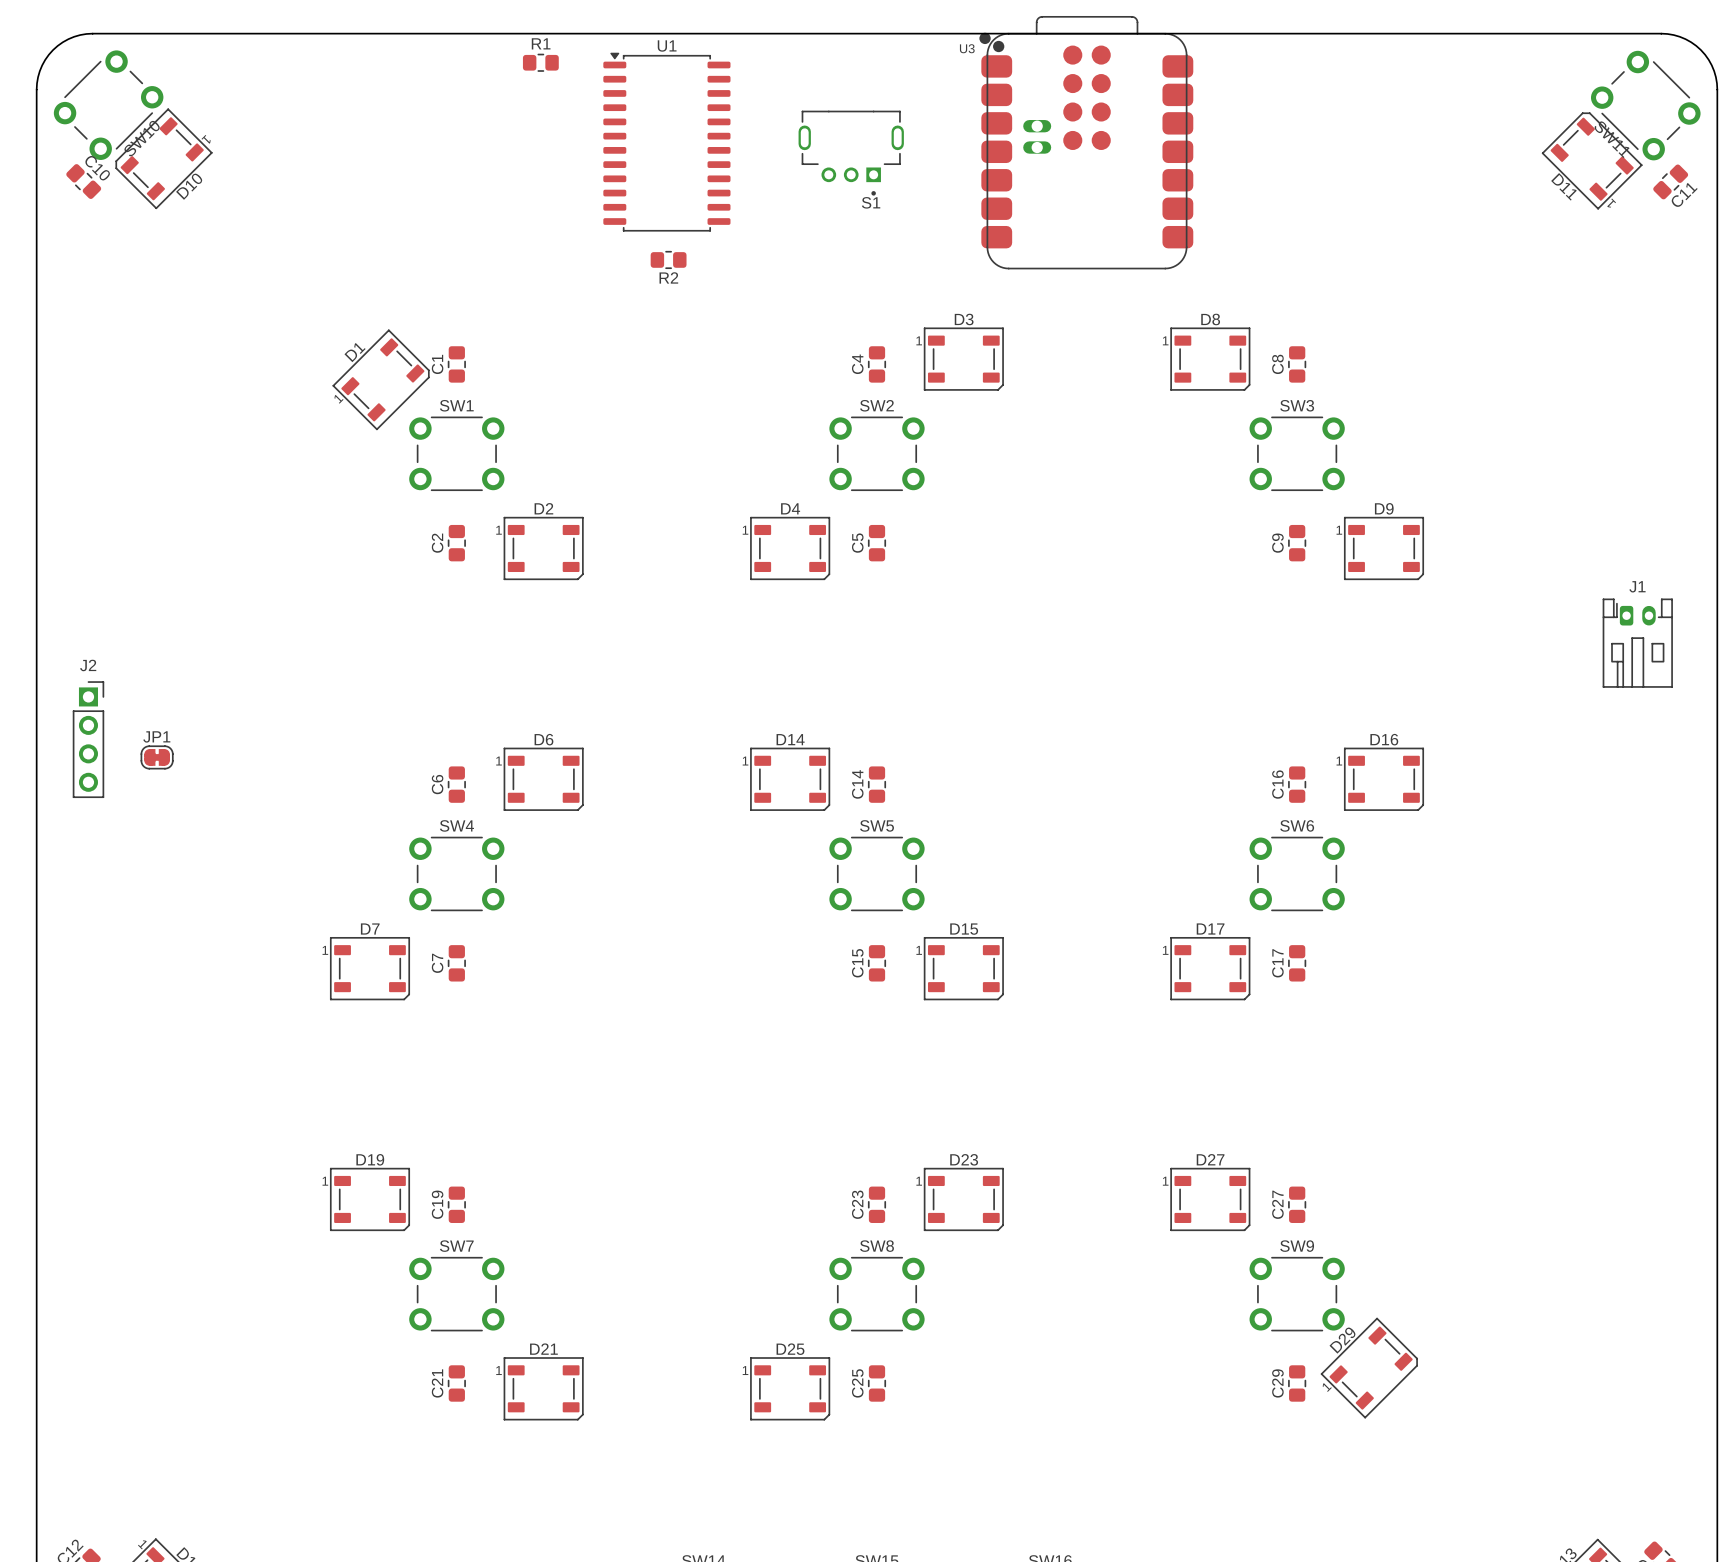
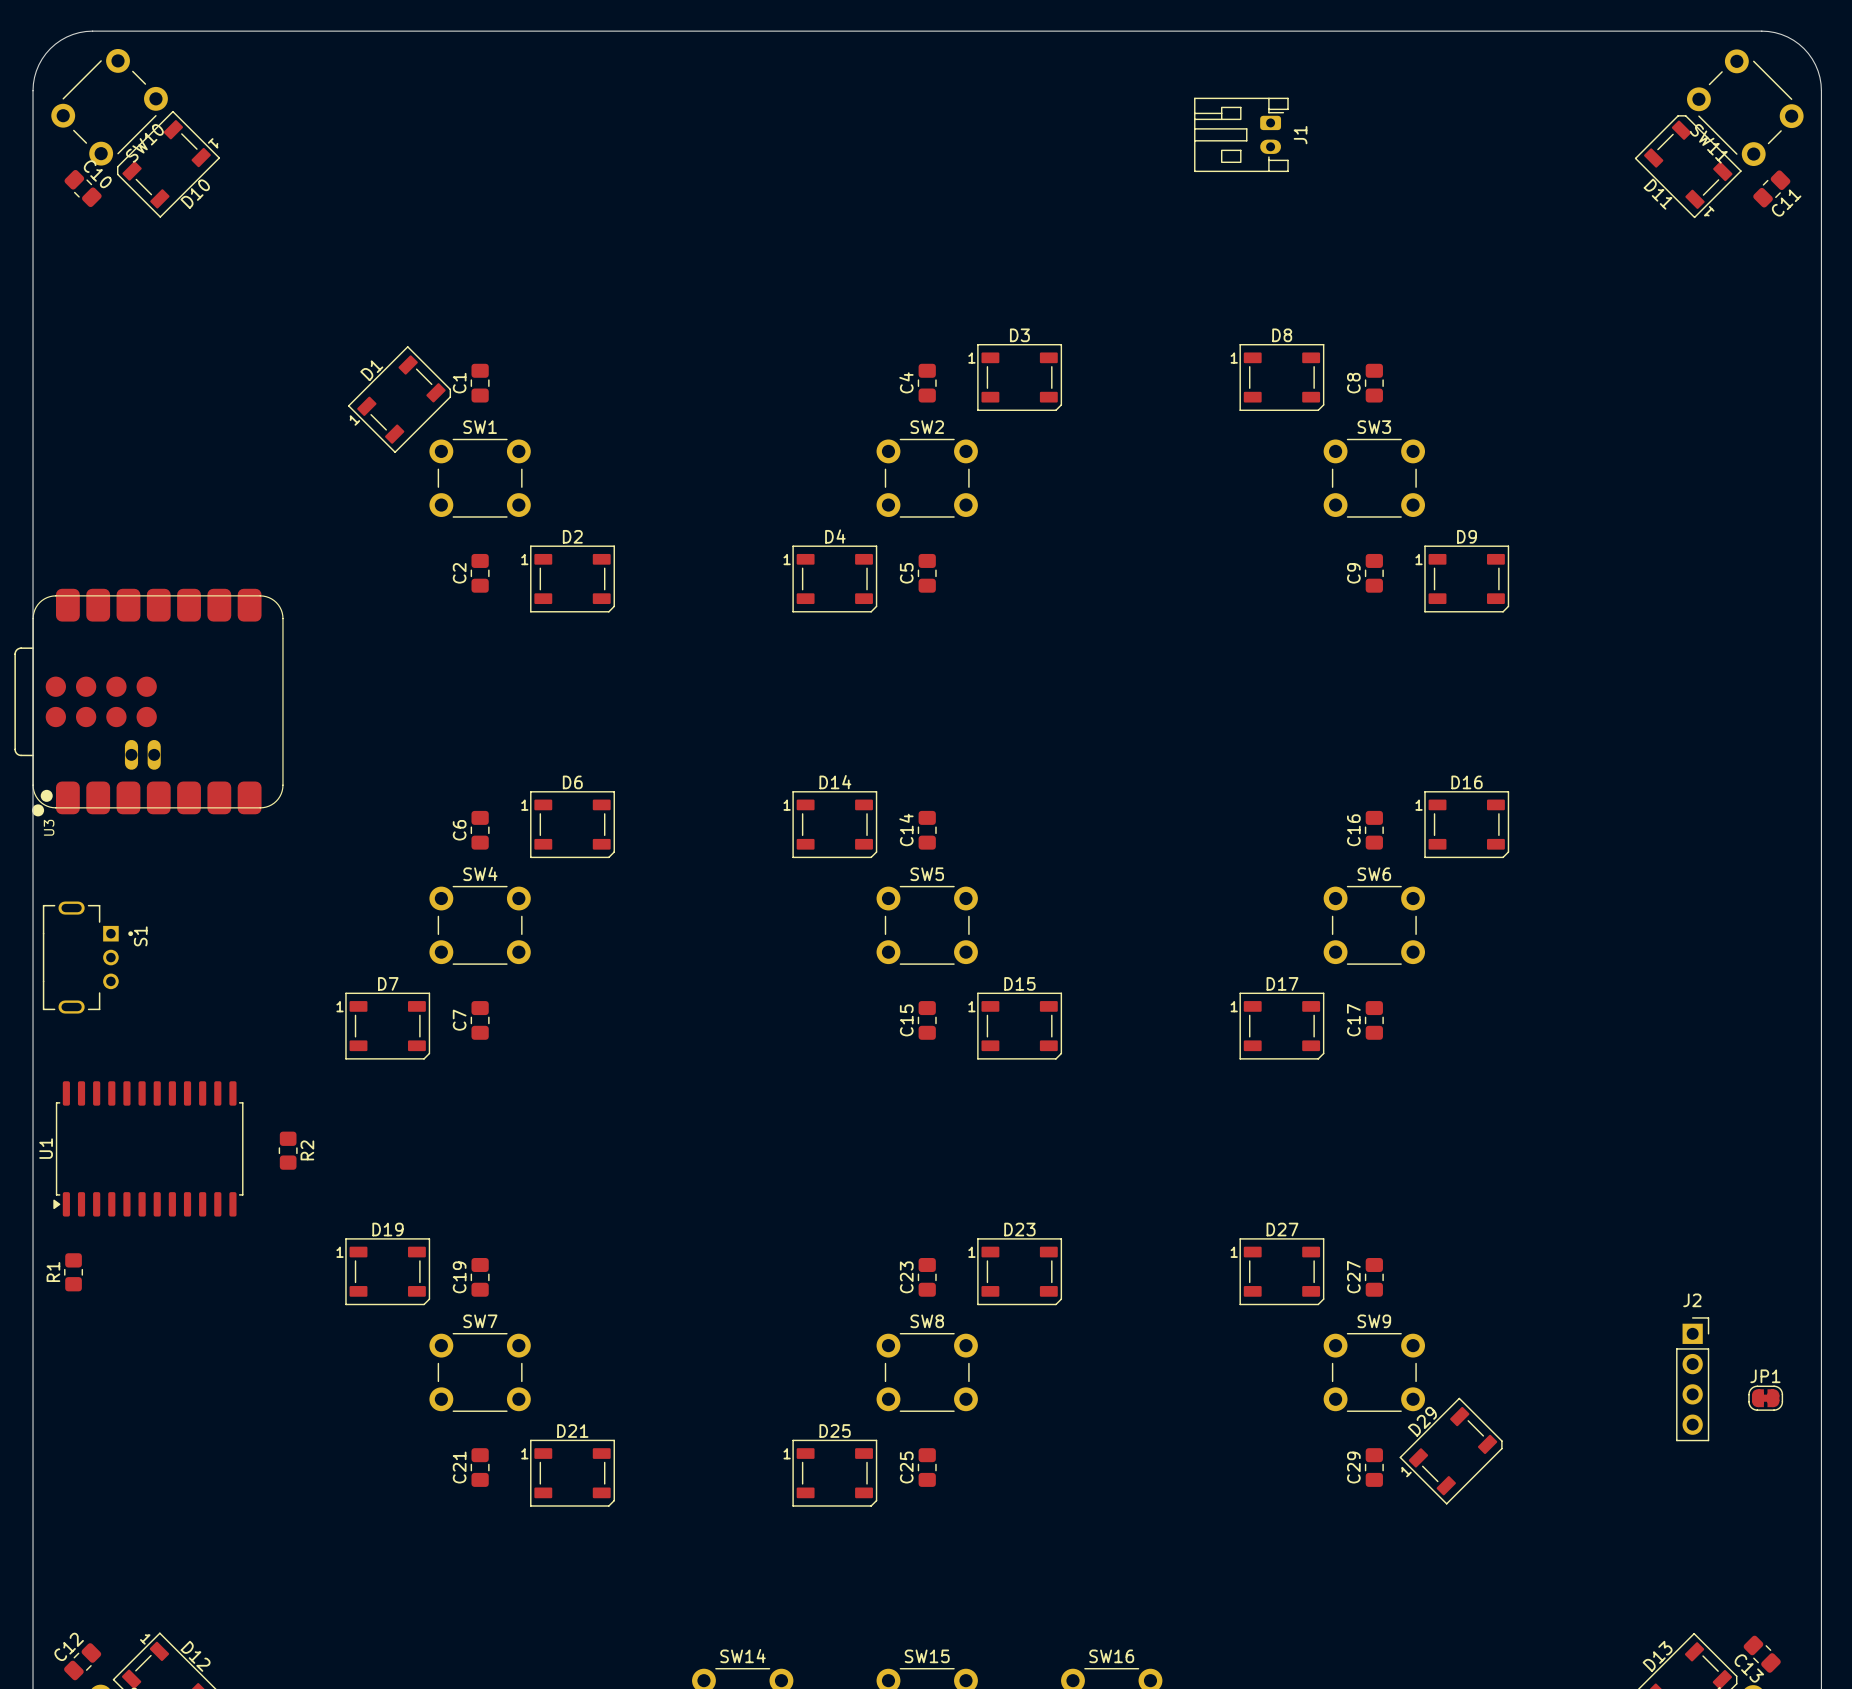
R1 name position: R1 (541, 43) -> R1 (53, 1272)
R1 rotation: 0° (540, 62) -> 90° clockwise (73, 1272)
R1 position: (540, 62) -> (73, 1272)
U1 rotation: 0° (666, 142) -> 90° counterclockwise (148, 1148)
U1 position: (666, 142) -> (148, 1148)
U3 rotation: 0° (1086, 142) -> 90° counterclockwise (148, 702)
U3 position: (1086, 142) -> (148, 702)
S1 rotation: 0° (851, 153) -> 90° counterclockwise (87, 957)
S1 position: (851, 153) -> (87, 957)
R2 rotation: 0° (668, 259) -> 90° clockwise (288, 1150)
R2 position: (668, 259) -> (288, 1150)
R2 name position: R2 (668, 277) -> R2 (307, 1150)
J1 rotation: 0° (1637, 643) -> 90° clockwise (1241, 134)
J1 position: (1637, 643) -> (1241, 134)
J2 position: (88, 739) -> (1692, 1379)
JP1 position: (157, 757) -> (1765, 1398)

